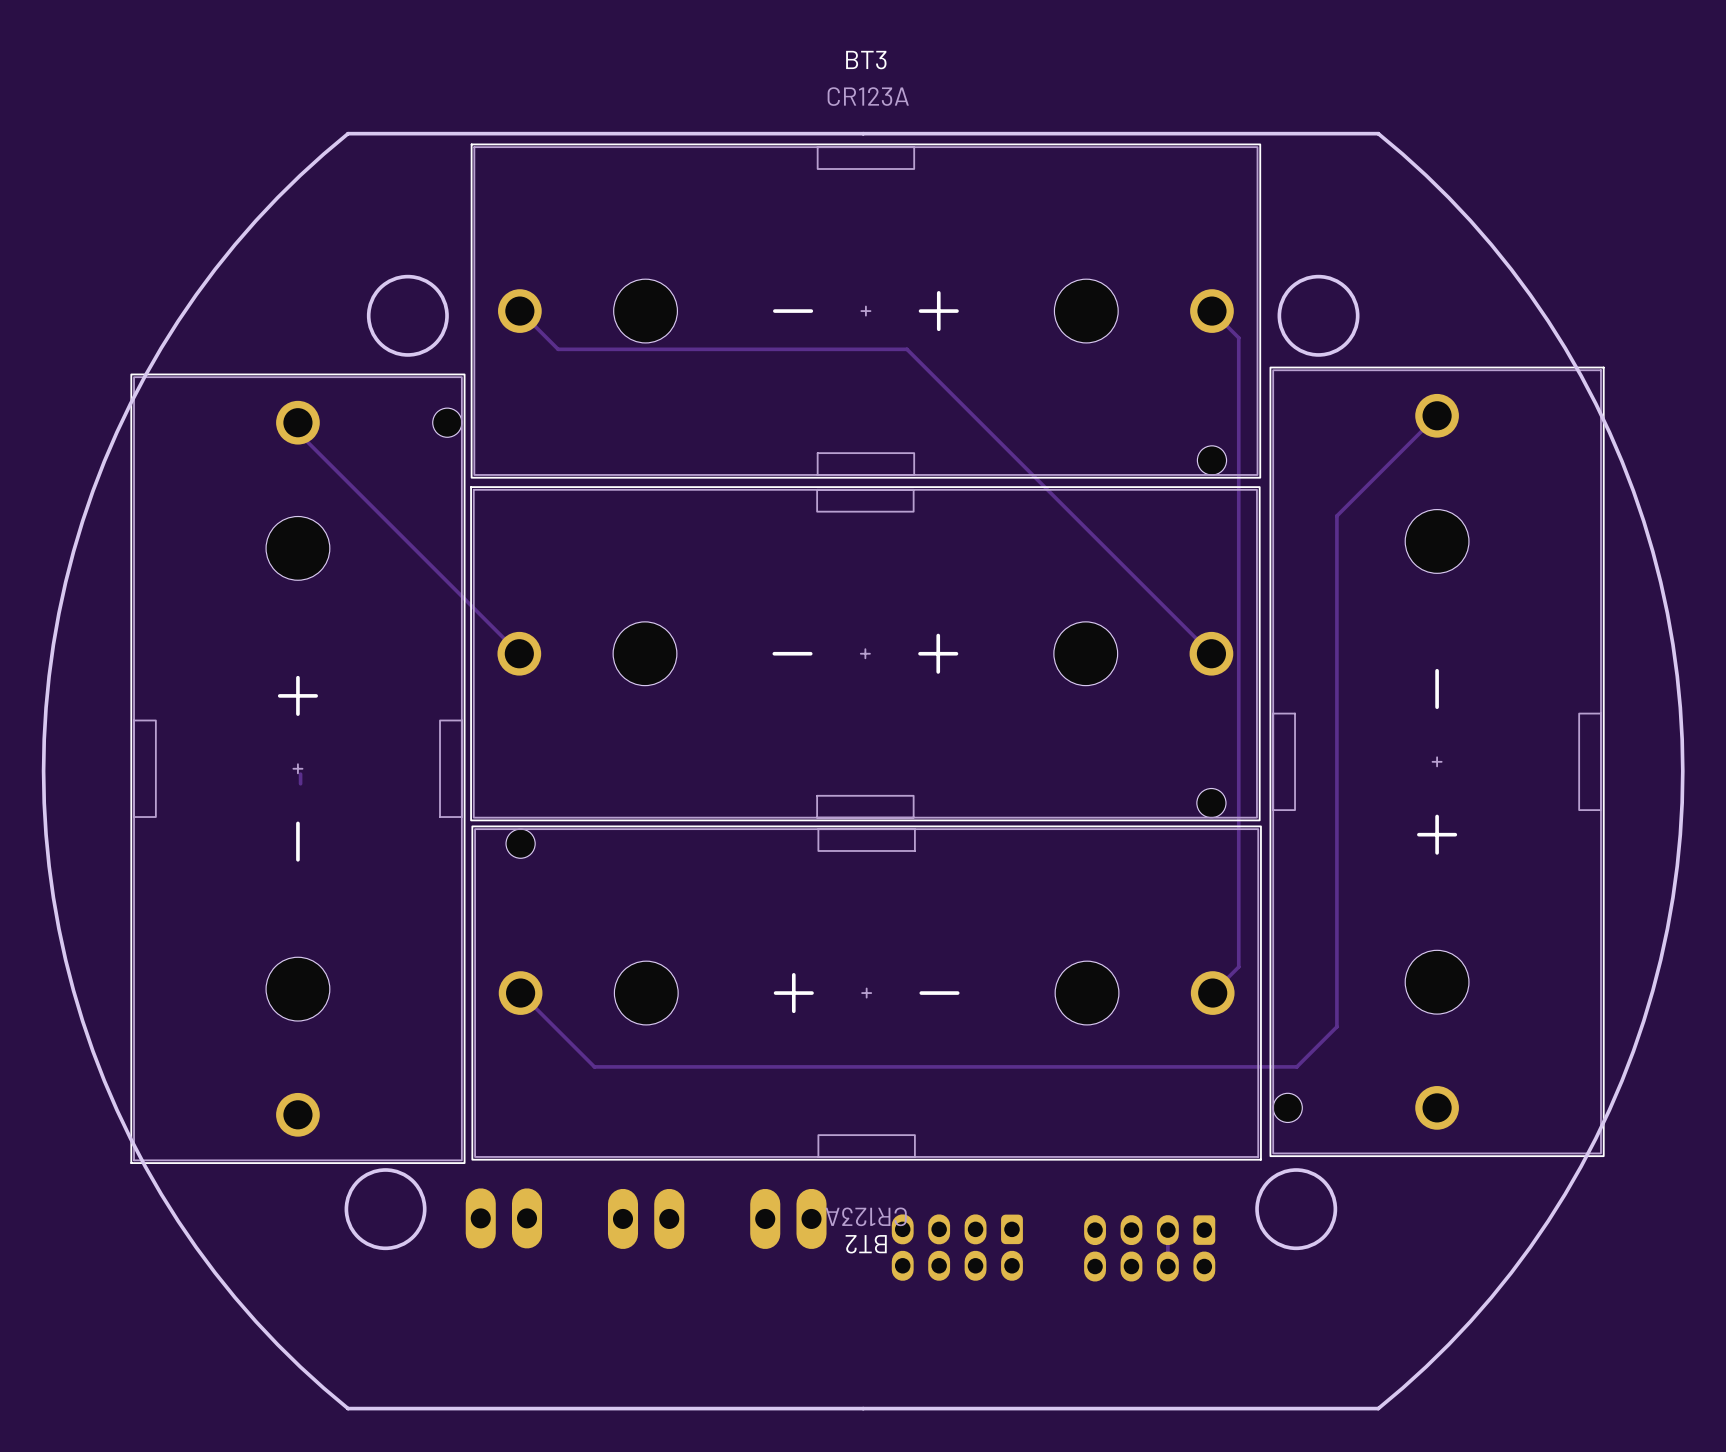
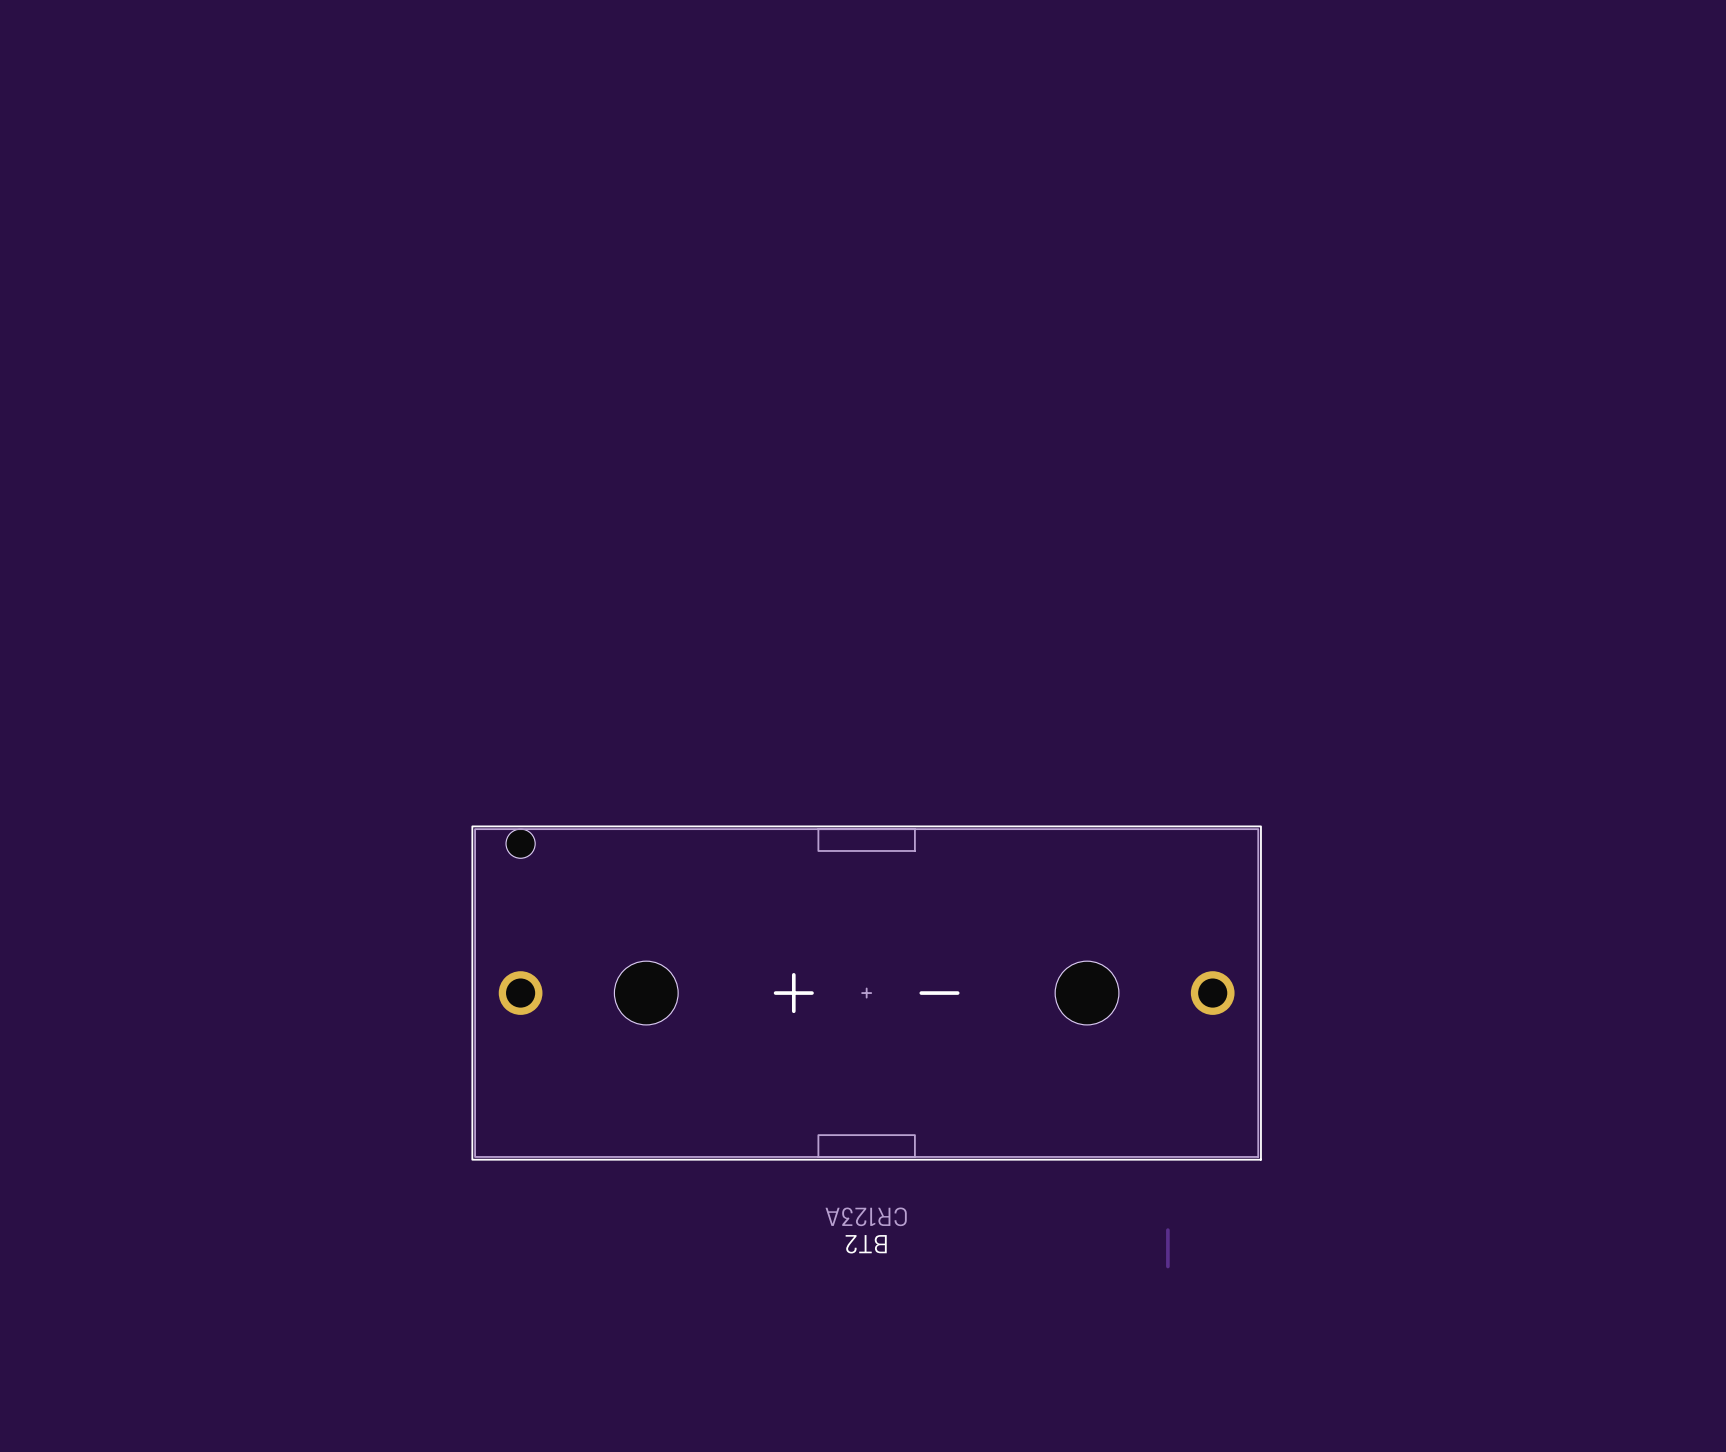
board edge: (1378, 133) (348, 133) (277, 197) (234, 244) (178, 321) (145, 375) (104, 461) (82, 521) (65, 582) (49, 676) (43, 771) (46, 834) (58, 928) (82, 1021) (104, 1080) (145, 1166) (178, 1221) (234, 1297) (300, 1366) (348, 1408) (1378, 1408) (1426, 1366) (1491, 1297) (1530, 1247) (1581, 1166) (1609, 1109) (1643, 1021) (1660, 959) (1677, 866) (1682, 771) (1677, 676) (1660, 582) (1643, 521) (1609, 432) (1581, 375) (1530, 294) (1491, 244) (1448, 197) (1378, 133) -> none
round board edge: [366, 274, 449, 357] -> none
round board edge: [1277, 274, 1360, 357] -> none
track: (519, 311) (558, 349) (907, 349) (1211, 653) -> none
BT3: CR123A (865, 311) -> none
track: (1211, 311) (1238, 337) (1238, 966) (1212, 993) -> none
track: (1437, 415) (1336, 515) (1336, 1026) (1296, 1066) (594, 1066) (520, 993) -> none
track: (297, 422) (297, 432) (519, 653) -> none
part: (865, 653) -> none
part: (1437, 761) -> none
part: (297, 768) -> none
track: (300, 774) (300, 783) -> none
round board edge: [344, 1168, 427, 1251] -> none
round board edge: [1255, 1168, 1338, 1251] -> none
part: (503, 1218) -> none
part: (646, 1218) -> none
part: (788, 1218) -> none
part: (957, 1247) -> none
part: (1149, 1248) -> none

